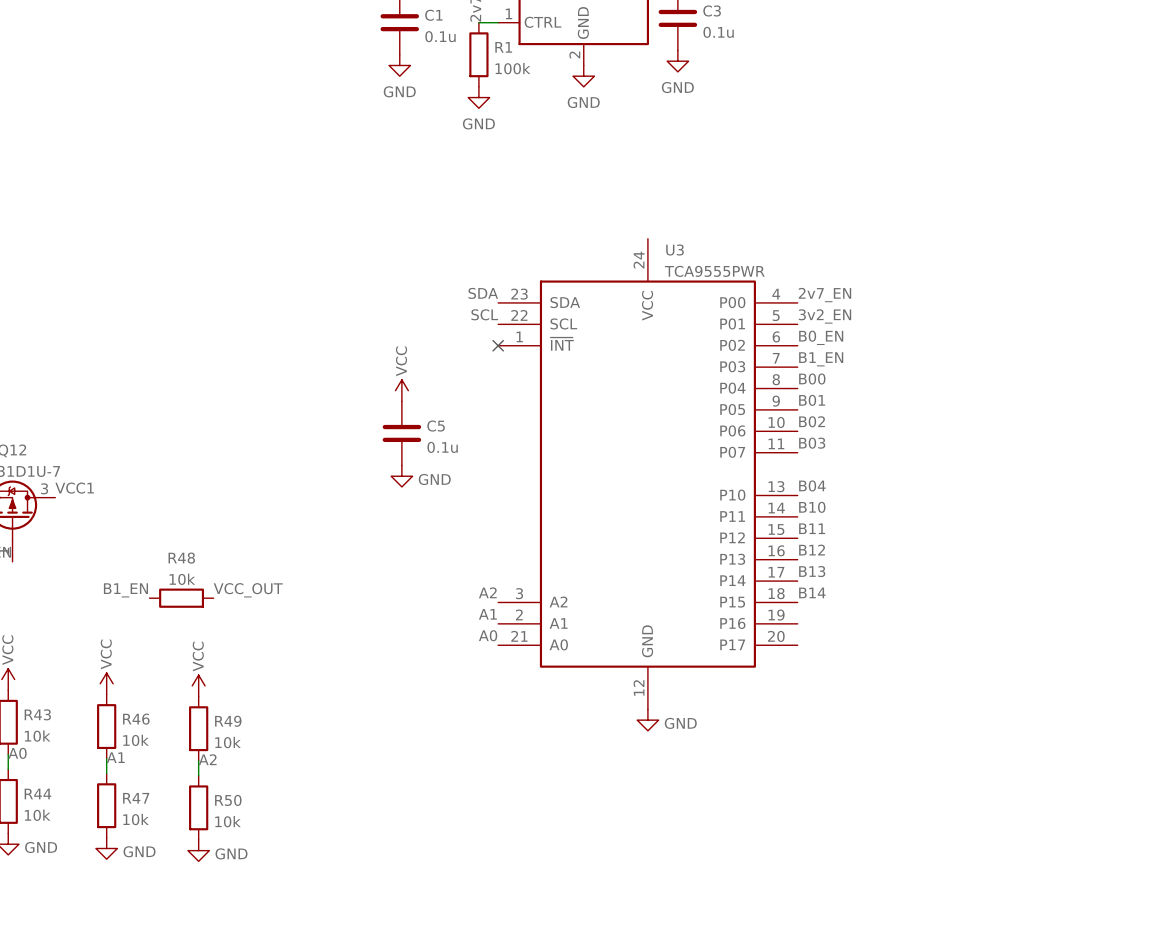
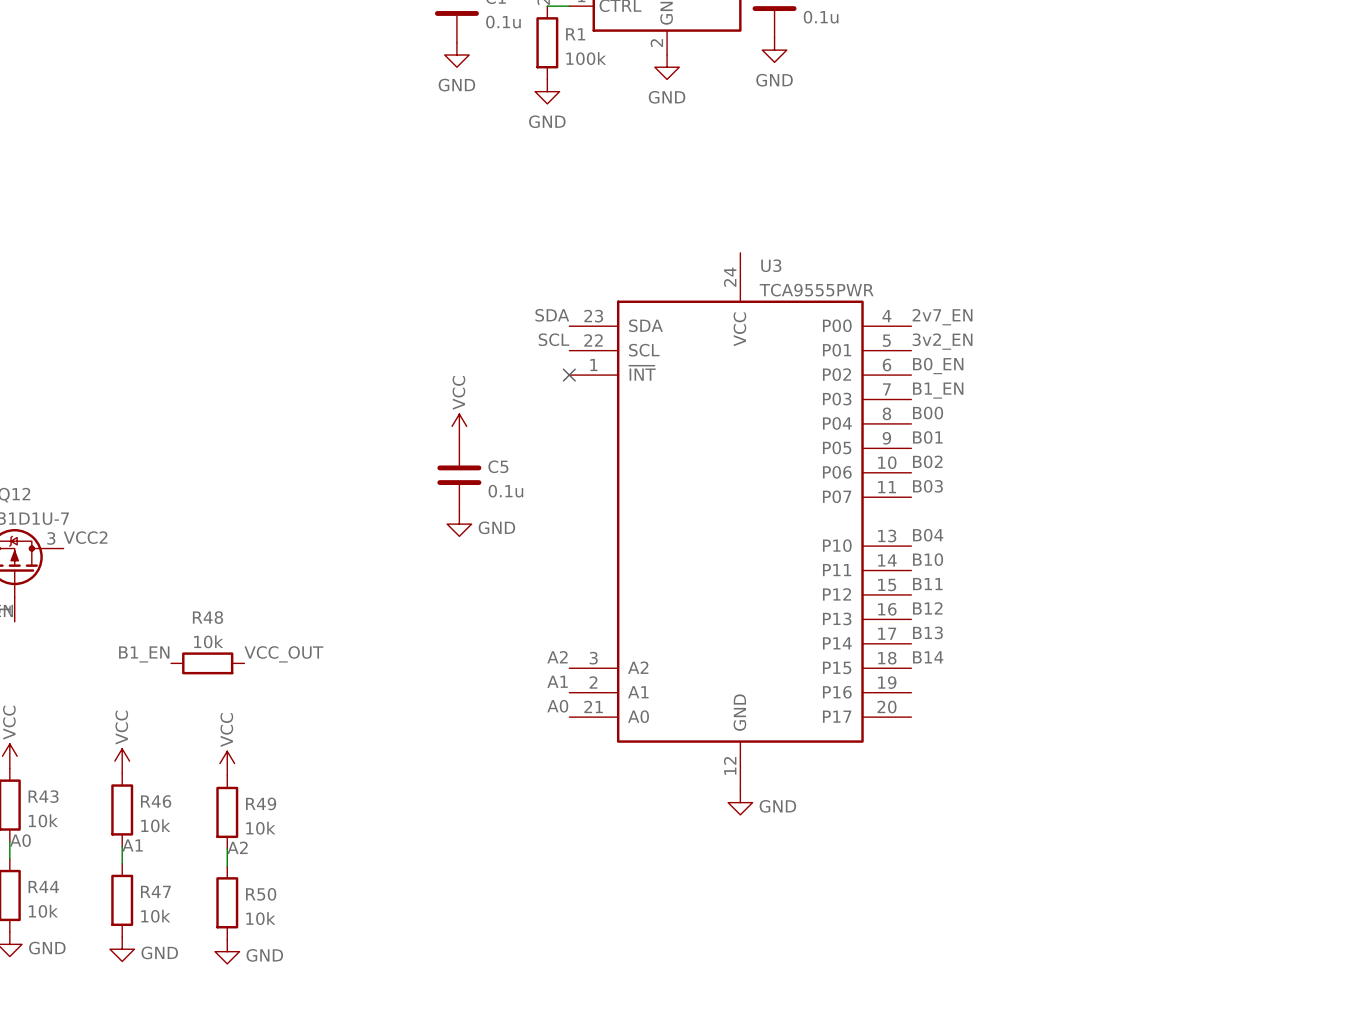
label: VCC1 (74, 488) -> VCC2 (85, 537)

